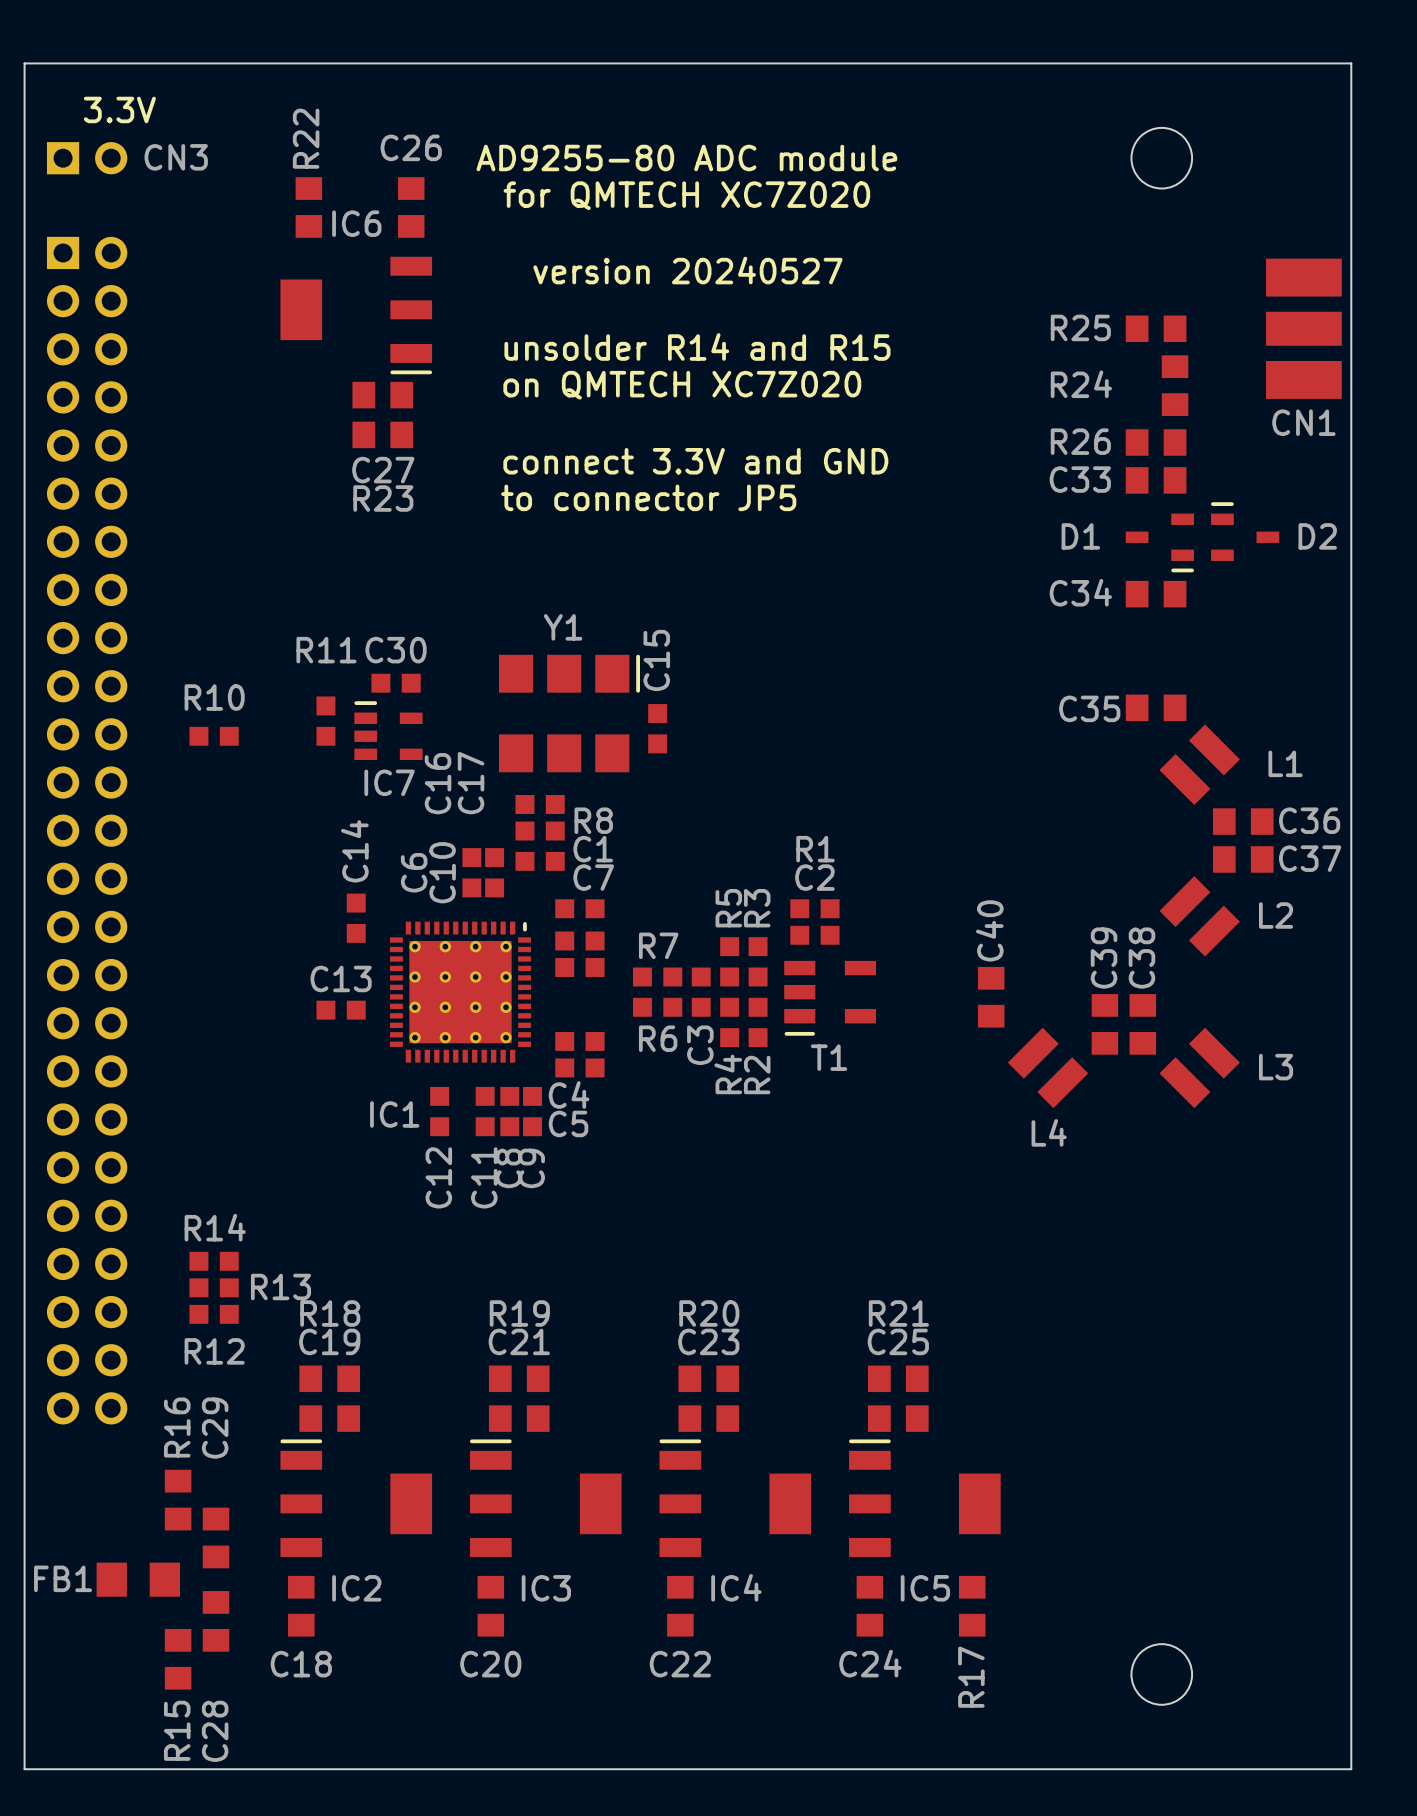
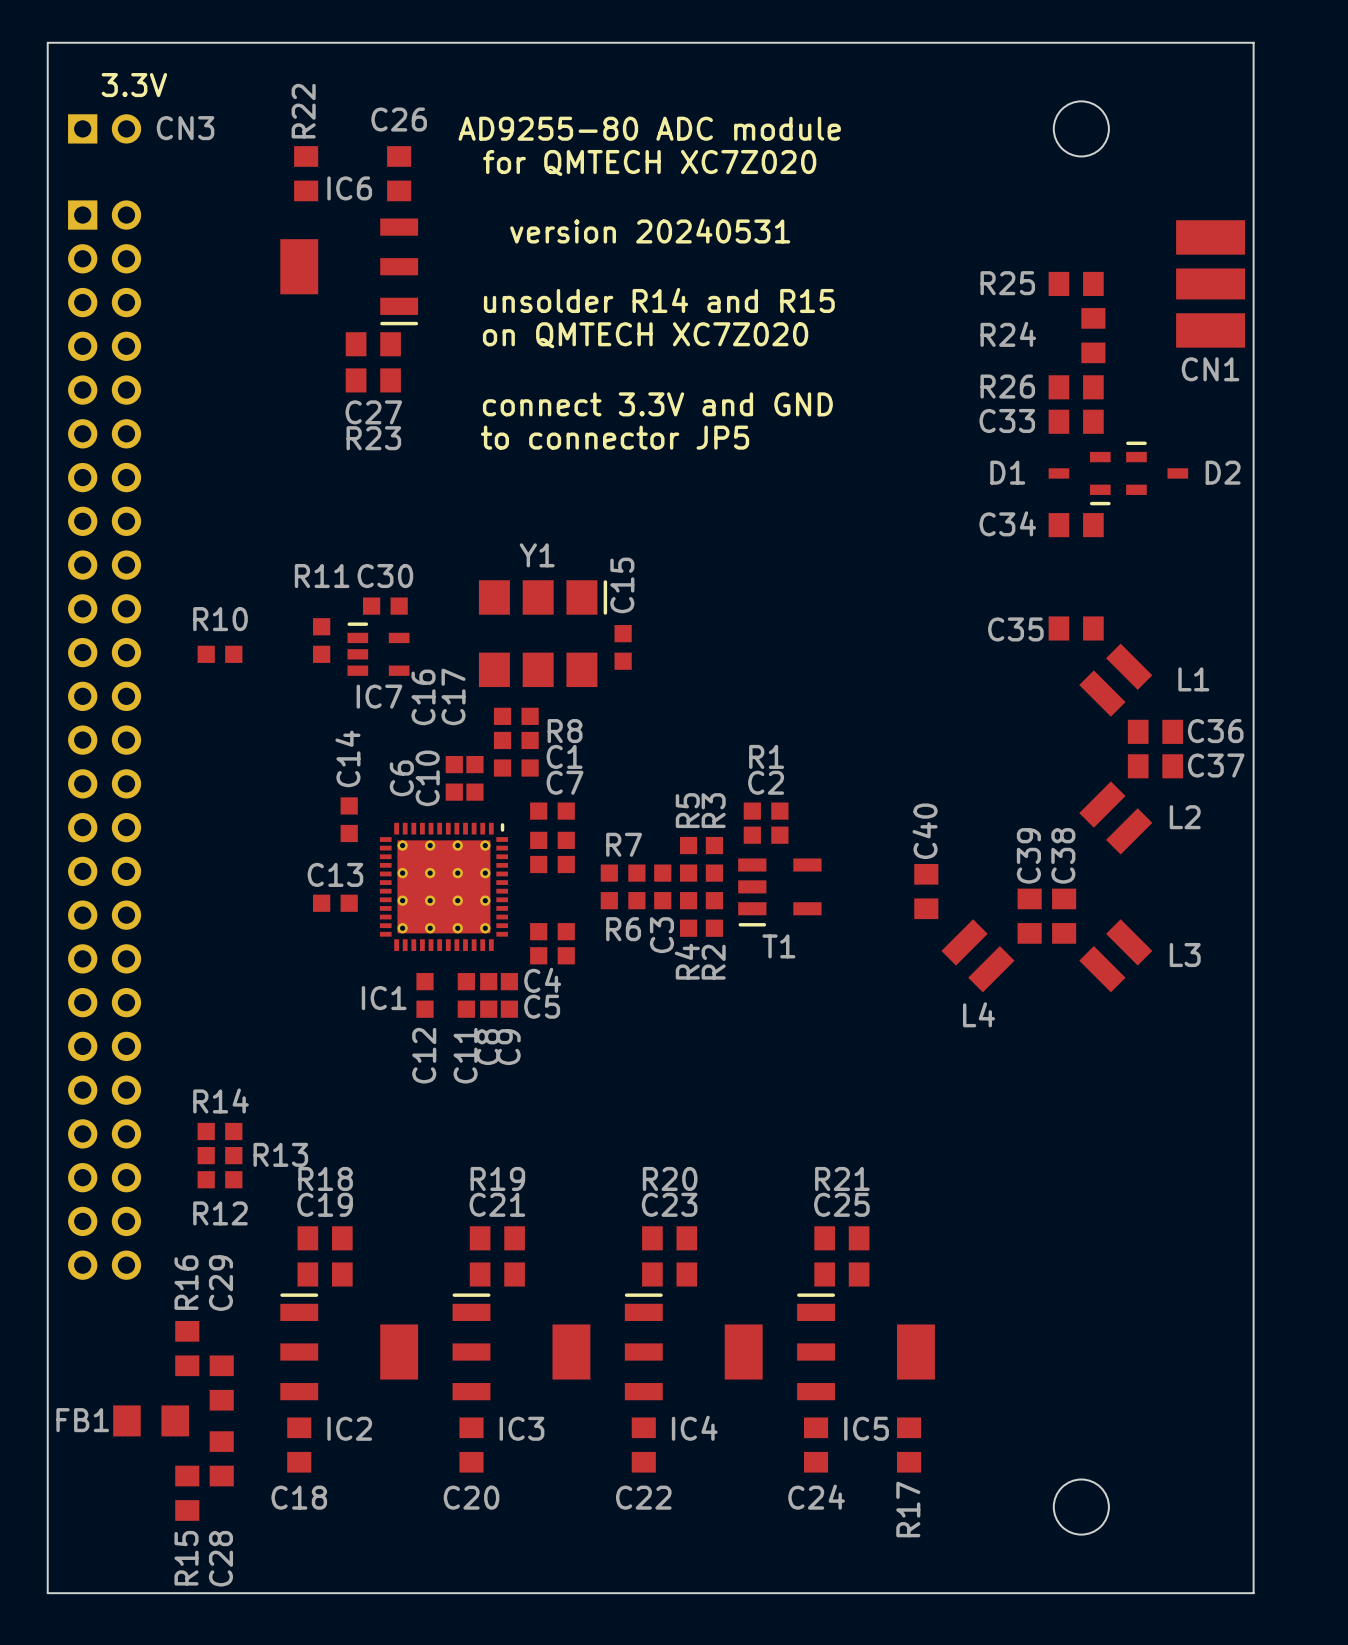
text: version 20240527 (687, 270) -> version 20240531 (650, 231)

